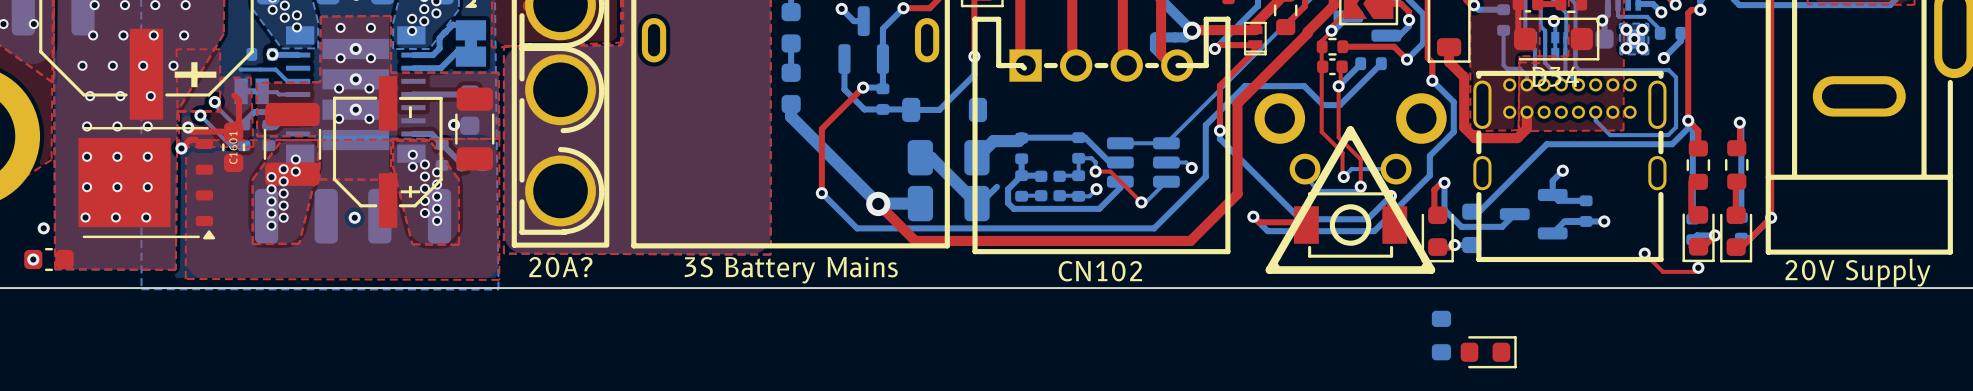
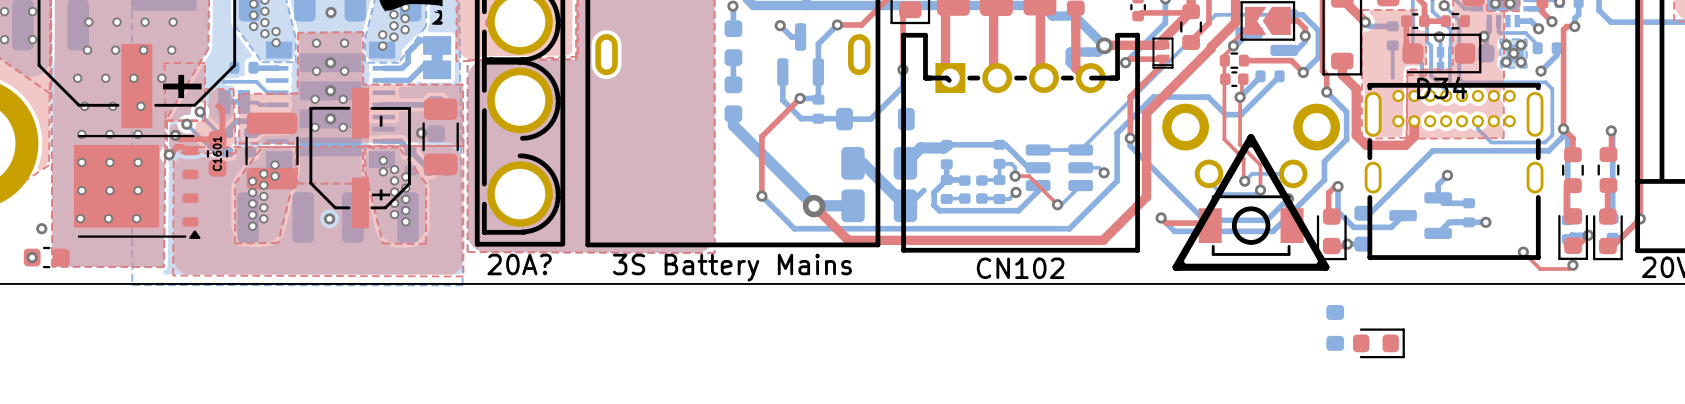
via: (272, 54) -> none
bottom track: (1503, 65) (1507, 68) (1520, 68) (1526, 75) (1526, 84) -> none

